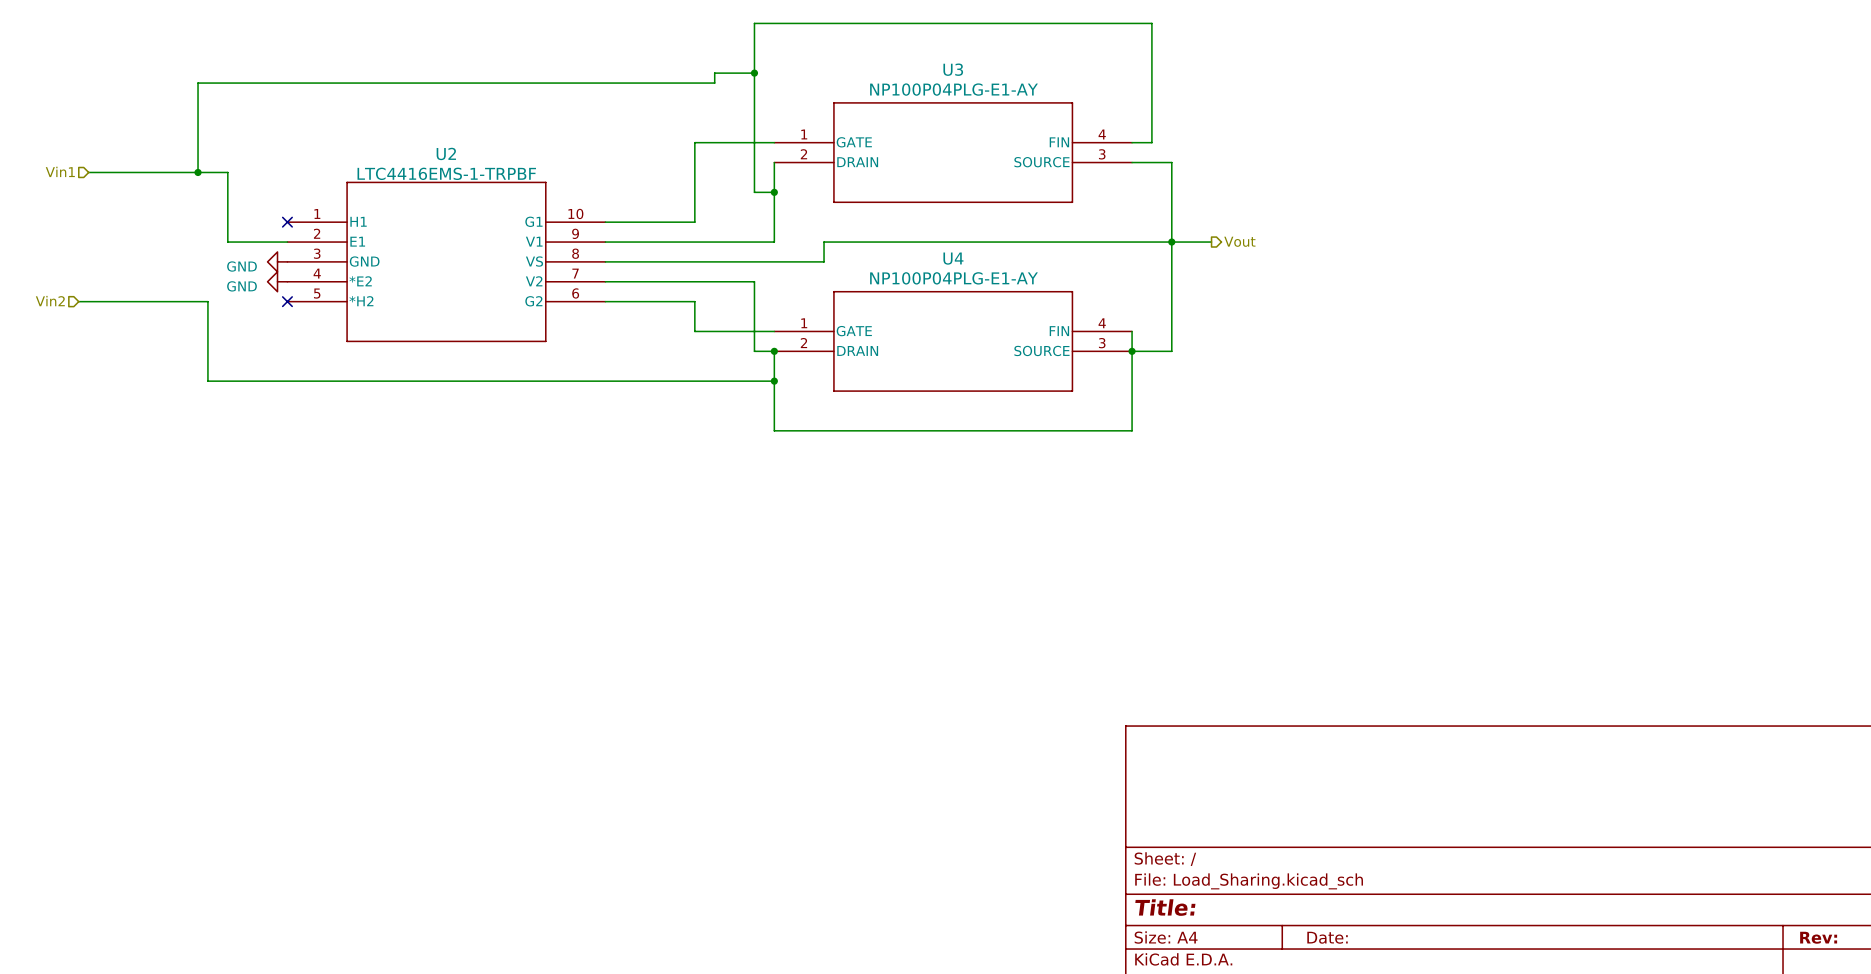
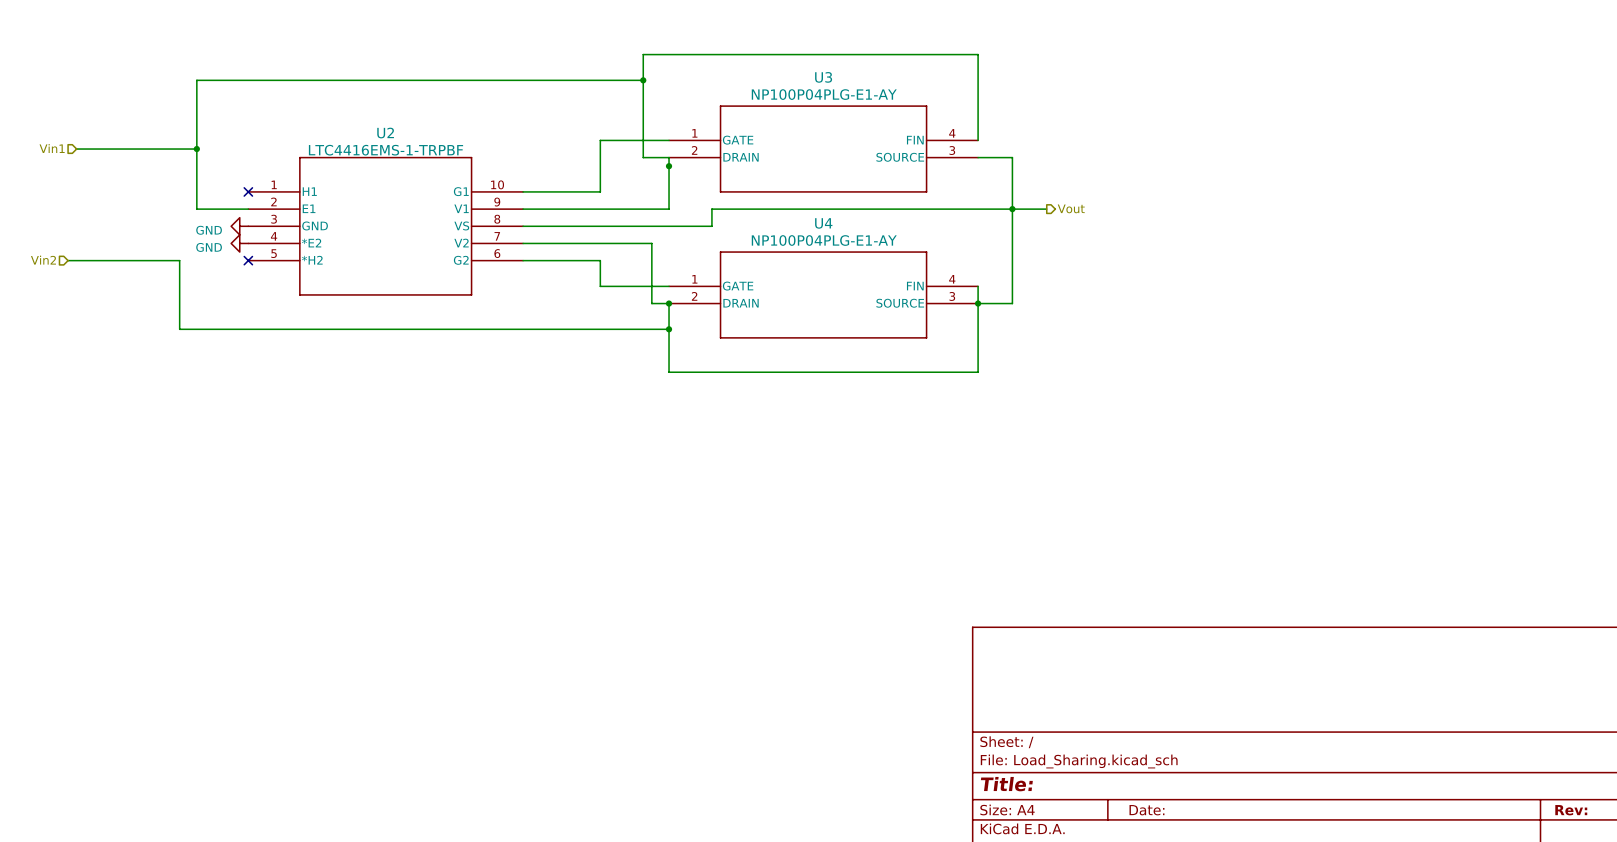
wire: (754, 73) (714, 73) (714, 83) (198, 83) (198, 172) -> none
junction position: (754, 73) -> (643, 80)
wire: none -> (643, 80) (196, 80) (196, 149)
wire: (774, 142) (694, 142) (694, 162) -> (669, 140) (600, 140)
wire: (1132, 142) (1151, 142) (1151, 23) (754, 23) (754, 192) (774, 192) -> none
U3 position: (953, 152) -> (823, 149)
wire: (774, 162) (774, 182) -> (978, 140) (978, 54) (643, 54) (643, 157) (669, 157)
wire: (1132, 162) (1171, 162) (1171, 182) -> (978, 157) (1012, 157)
junction position: (198, 172) -> (196, 149)

